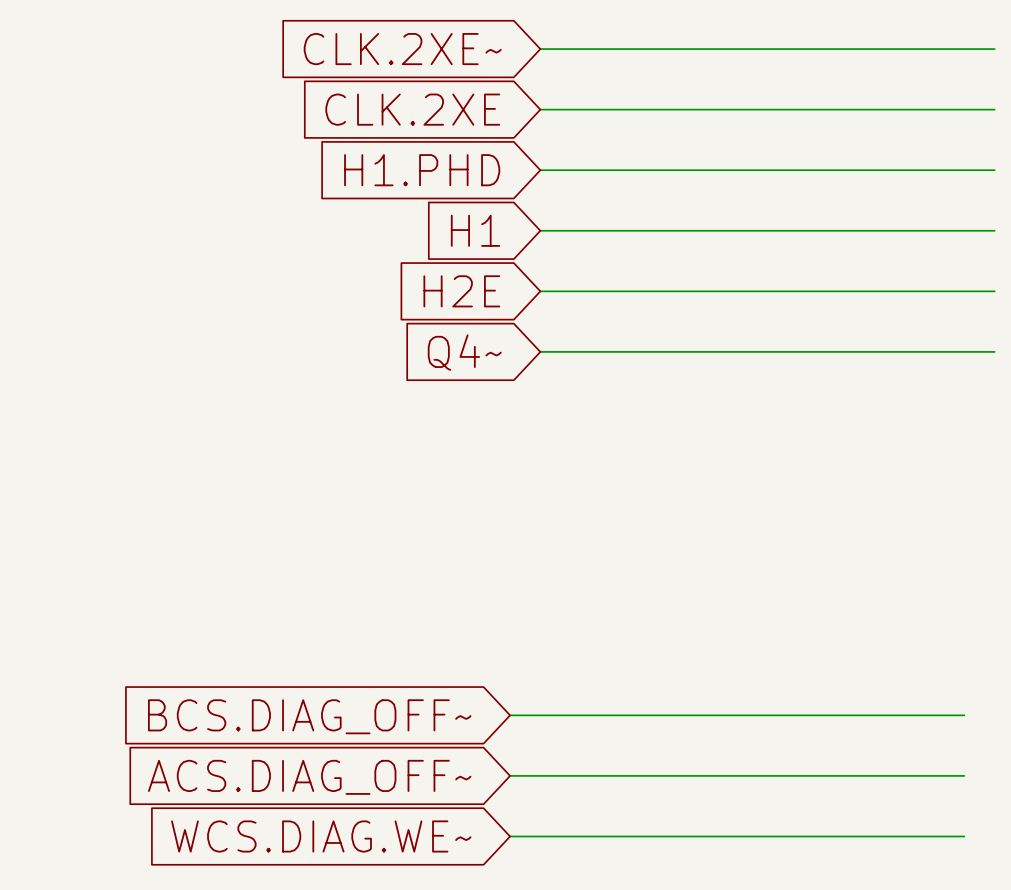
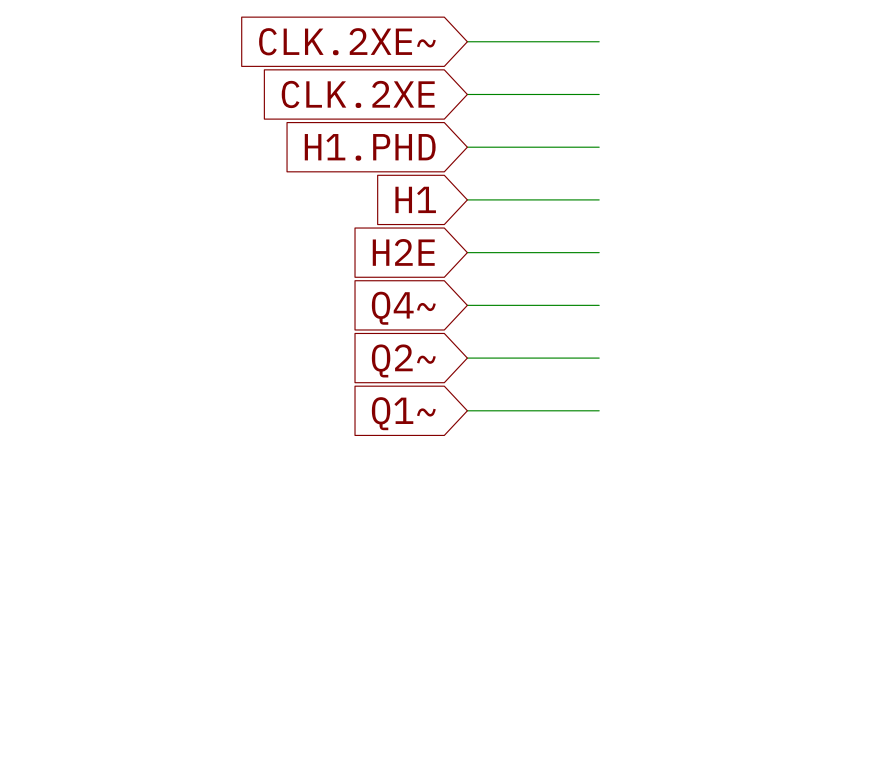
wire: (691, 49) (994, 49) -> none
wire: (691, 109) (994, 109) -> none
wire: (691, 170) (994, 170) -> none
wire: (691, 230) (994, 230) -> none
wire: (691, 291) (994, 291) -> none
wire: (691, 351) (994, 351) -> none
wire: none -> (467, 358) (599, 358)
global label: none -> Q2~ (403, 360)
wire: none -> (467, 410) (599, 410)
global label: none -> Q1~ (403, 413)
wire: (510, 715) (964, 715) -> none
global label: BCS.DIAG_OFF~ (309, 716) -> none
wire: (510, 775) (964, 775) -> none
global label: ACS.DIAG_OFF~ (309, 777) -> none
global label: WCS.DIAG.WE~ (321, 836) -> none
wire: (510, 836) (964, 836) -> none

